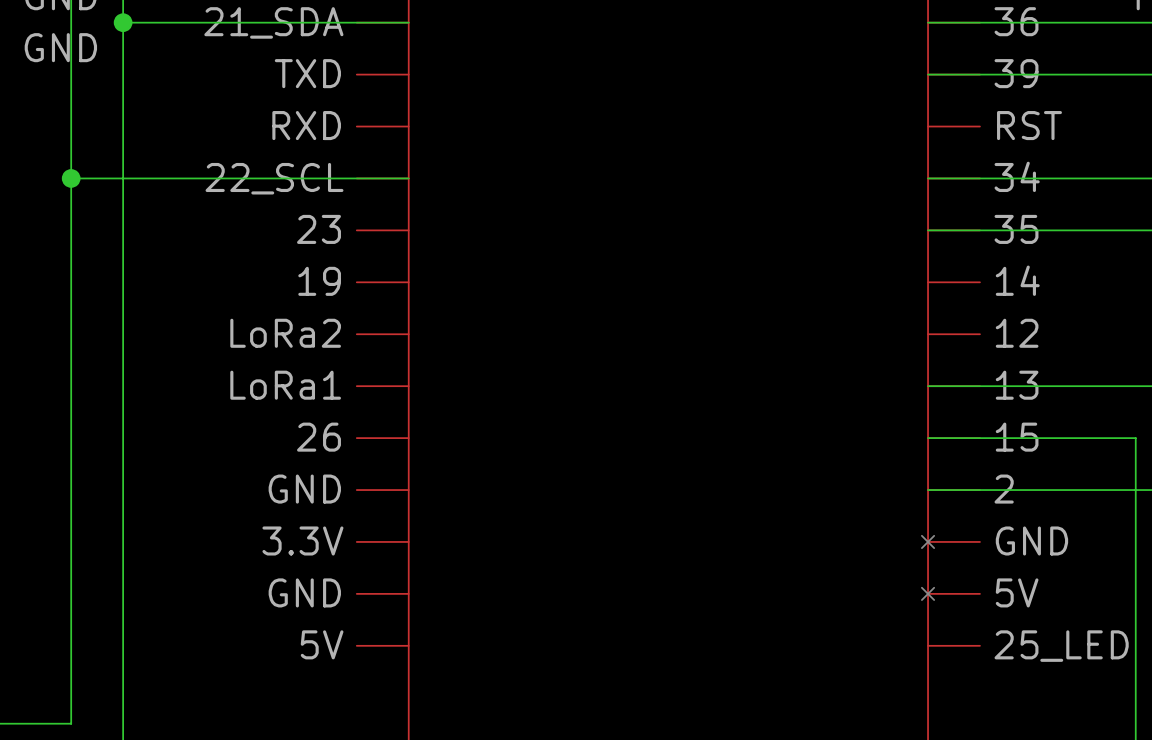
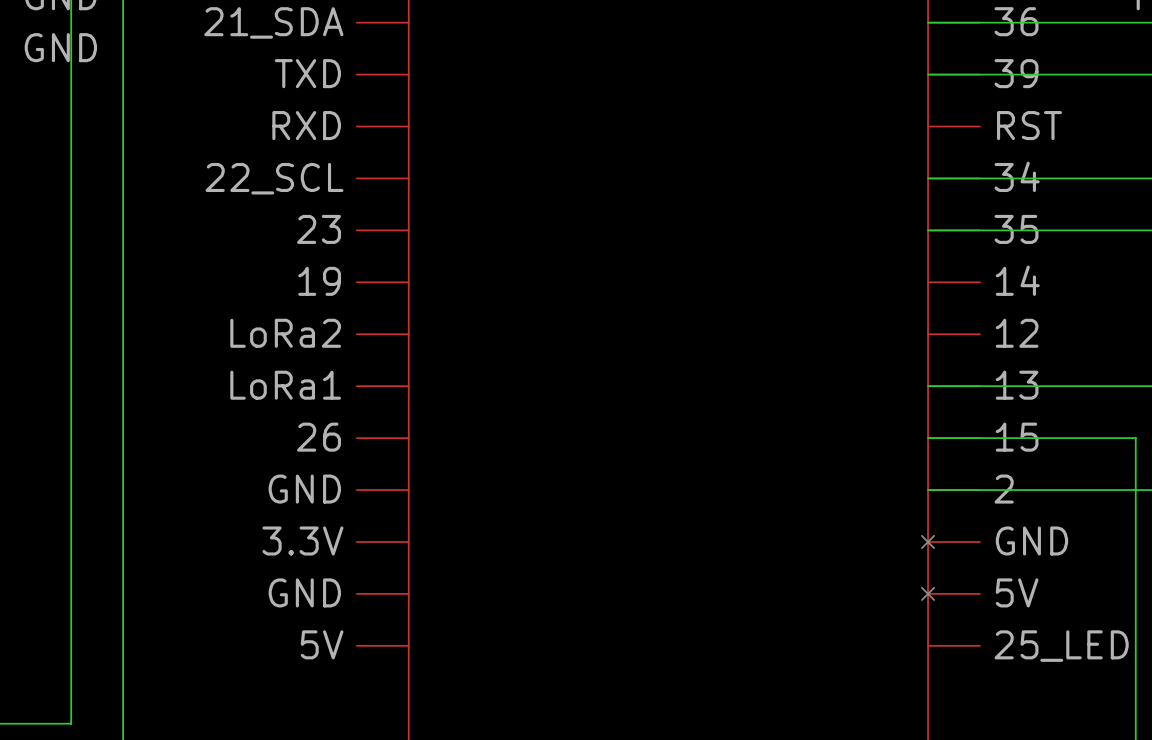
wire: (123, 22) (408, 22) -> none
junction: (123, 22) -> none
wire: (71, 178) (408, 178) -> none
junction: (71, 178) -> none

